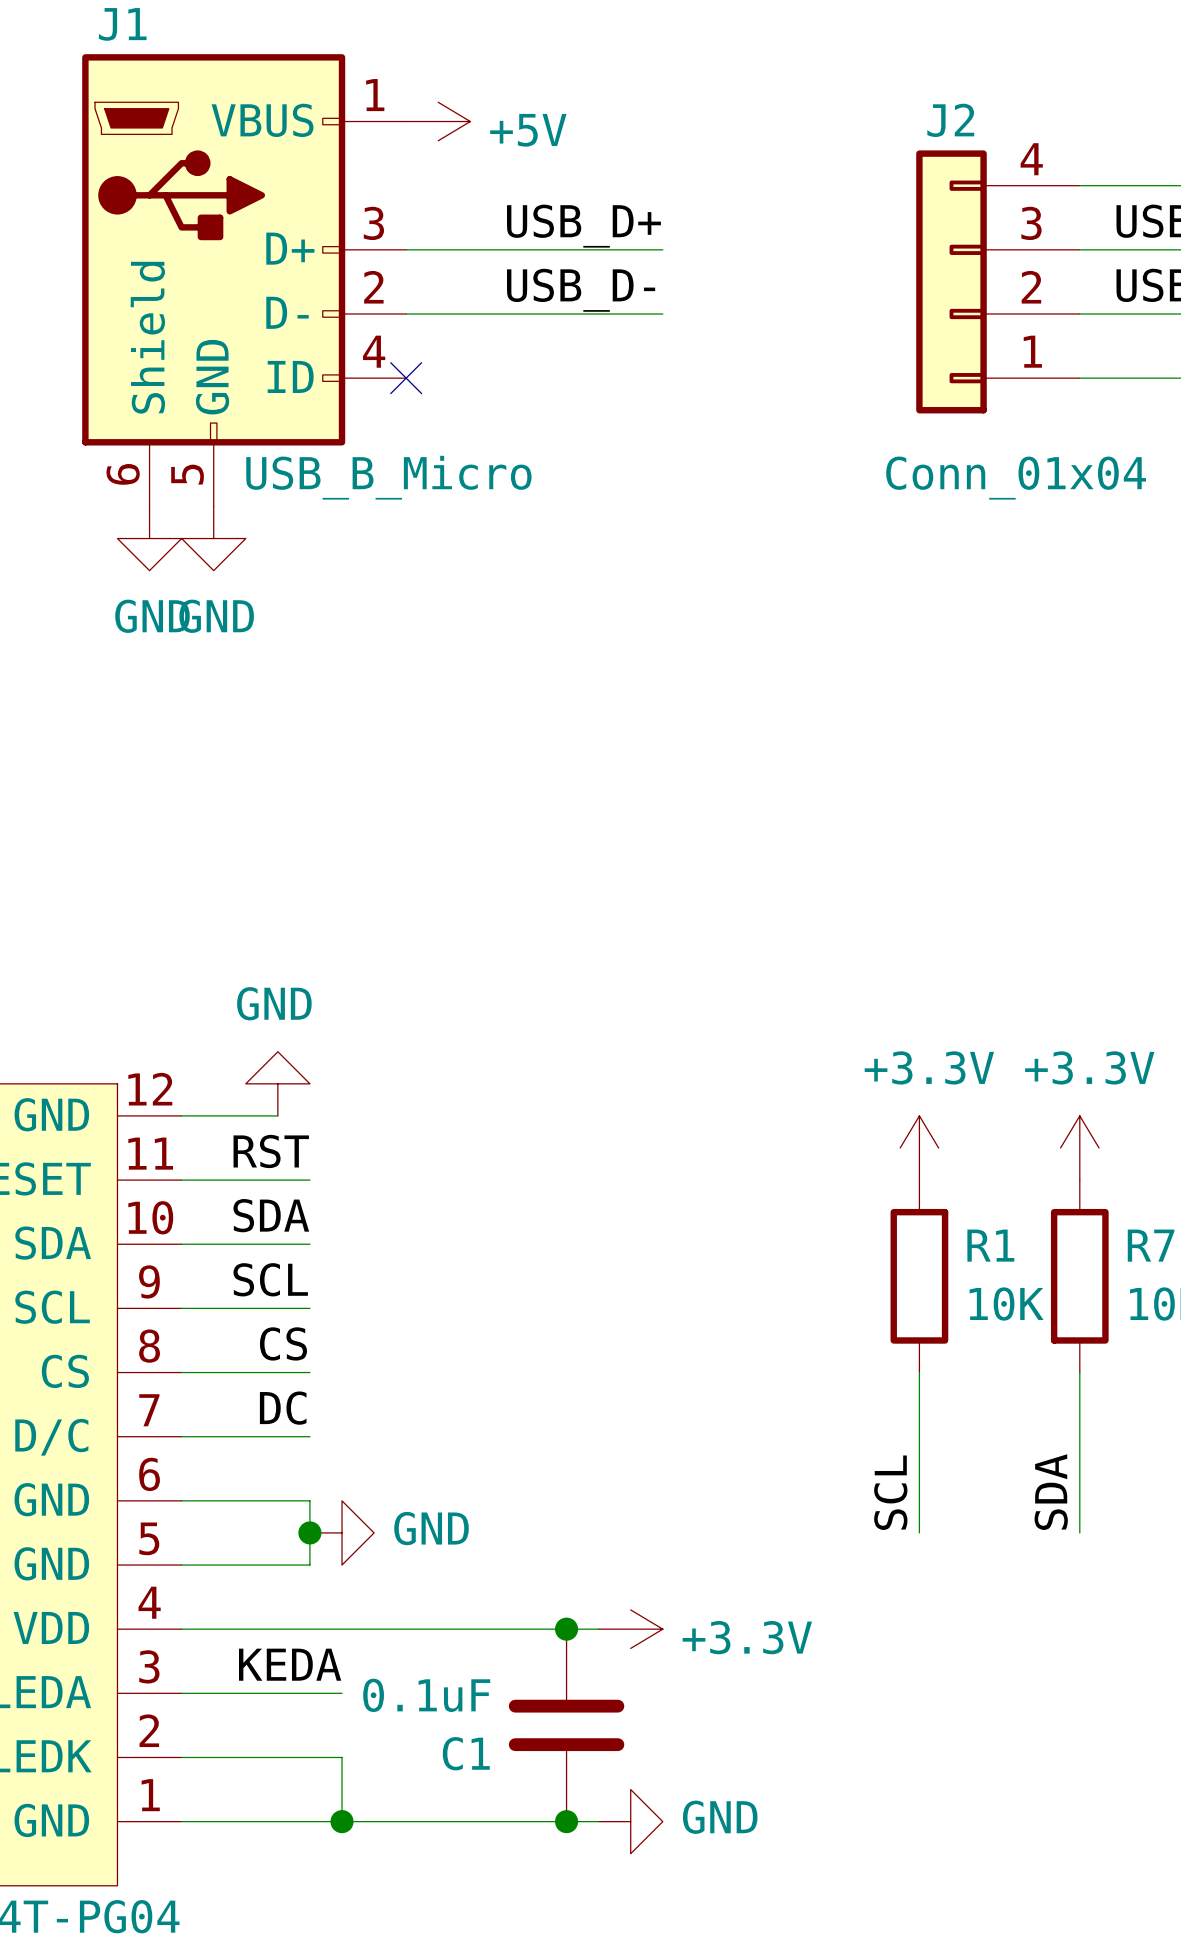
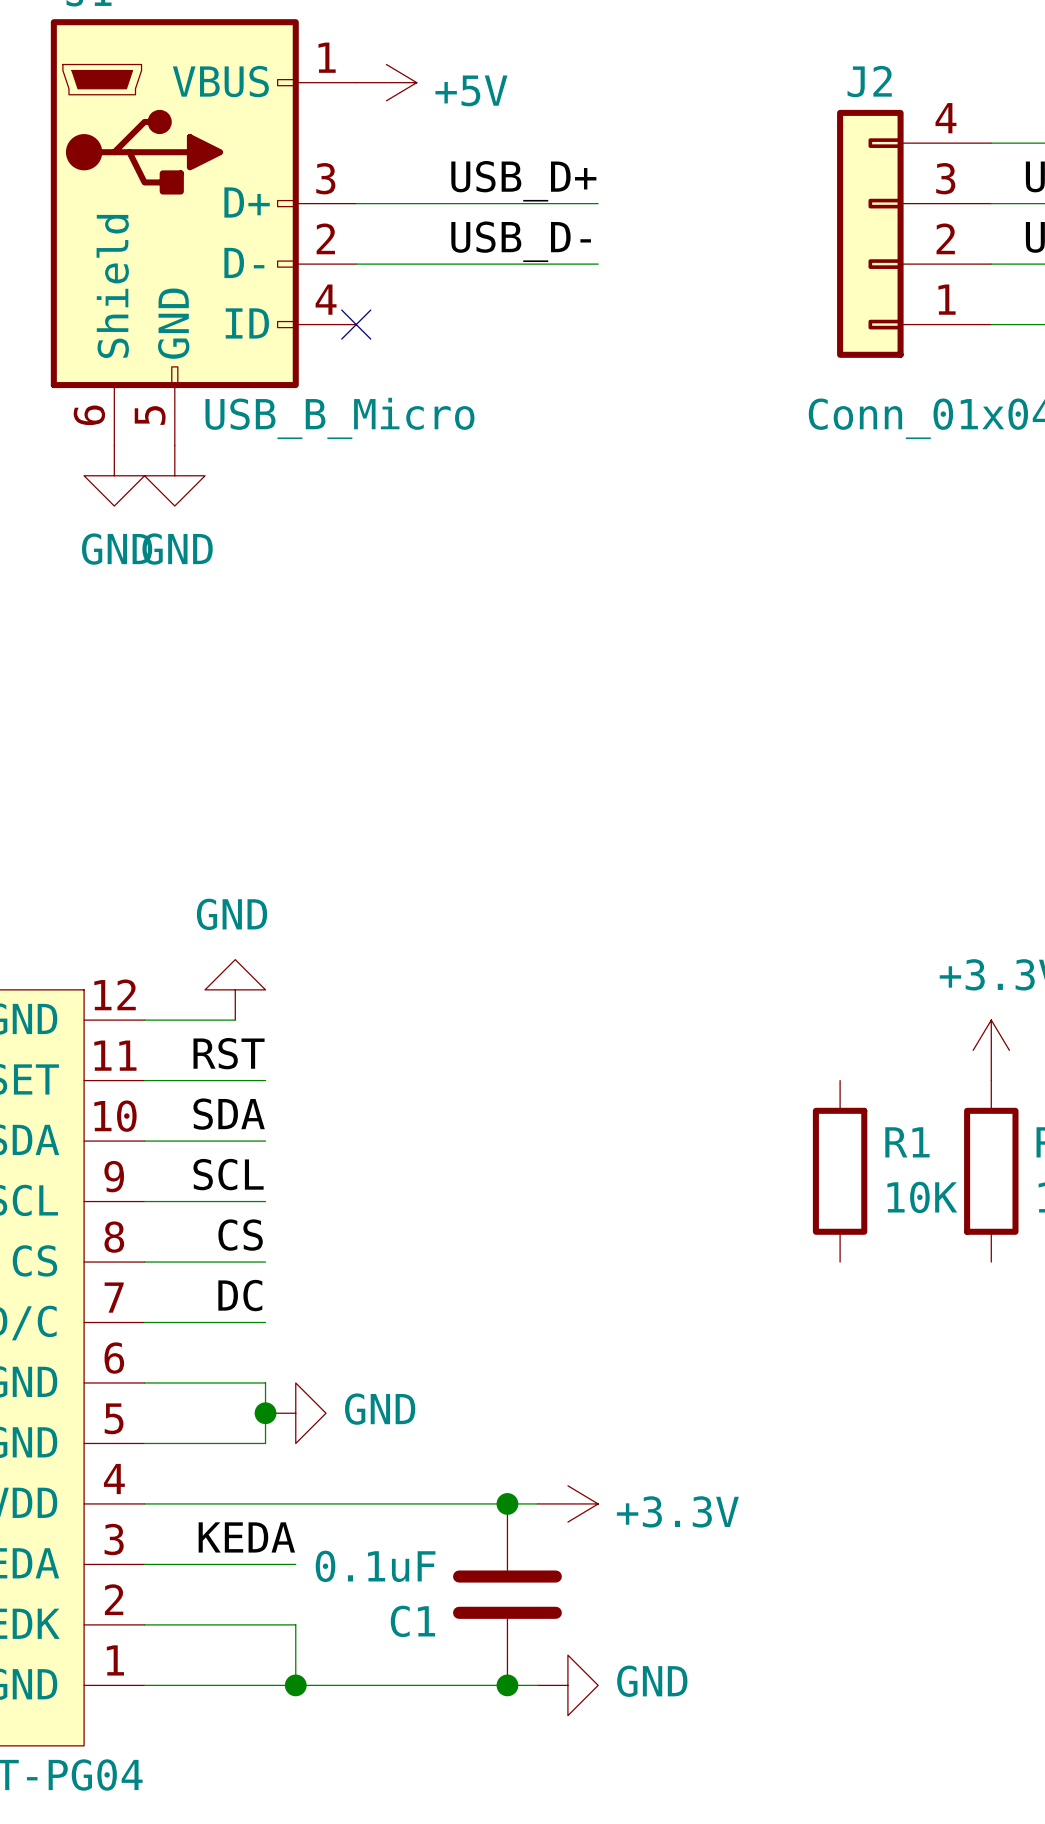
power symbol: +3.3V (919, 1148) -> none
wire: (919, 1372) (919, 1532) -> none
wire: (1079, 1372) (1079, 1532) -> none
label: SCL (890, 1492) -> none
label: SDA (1051, 1492) -> none

